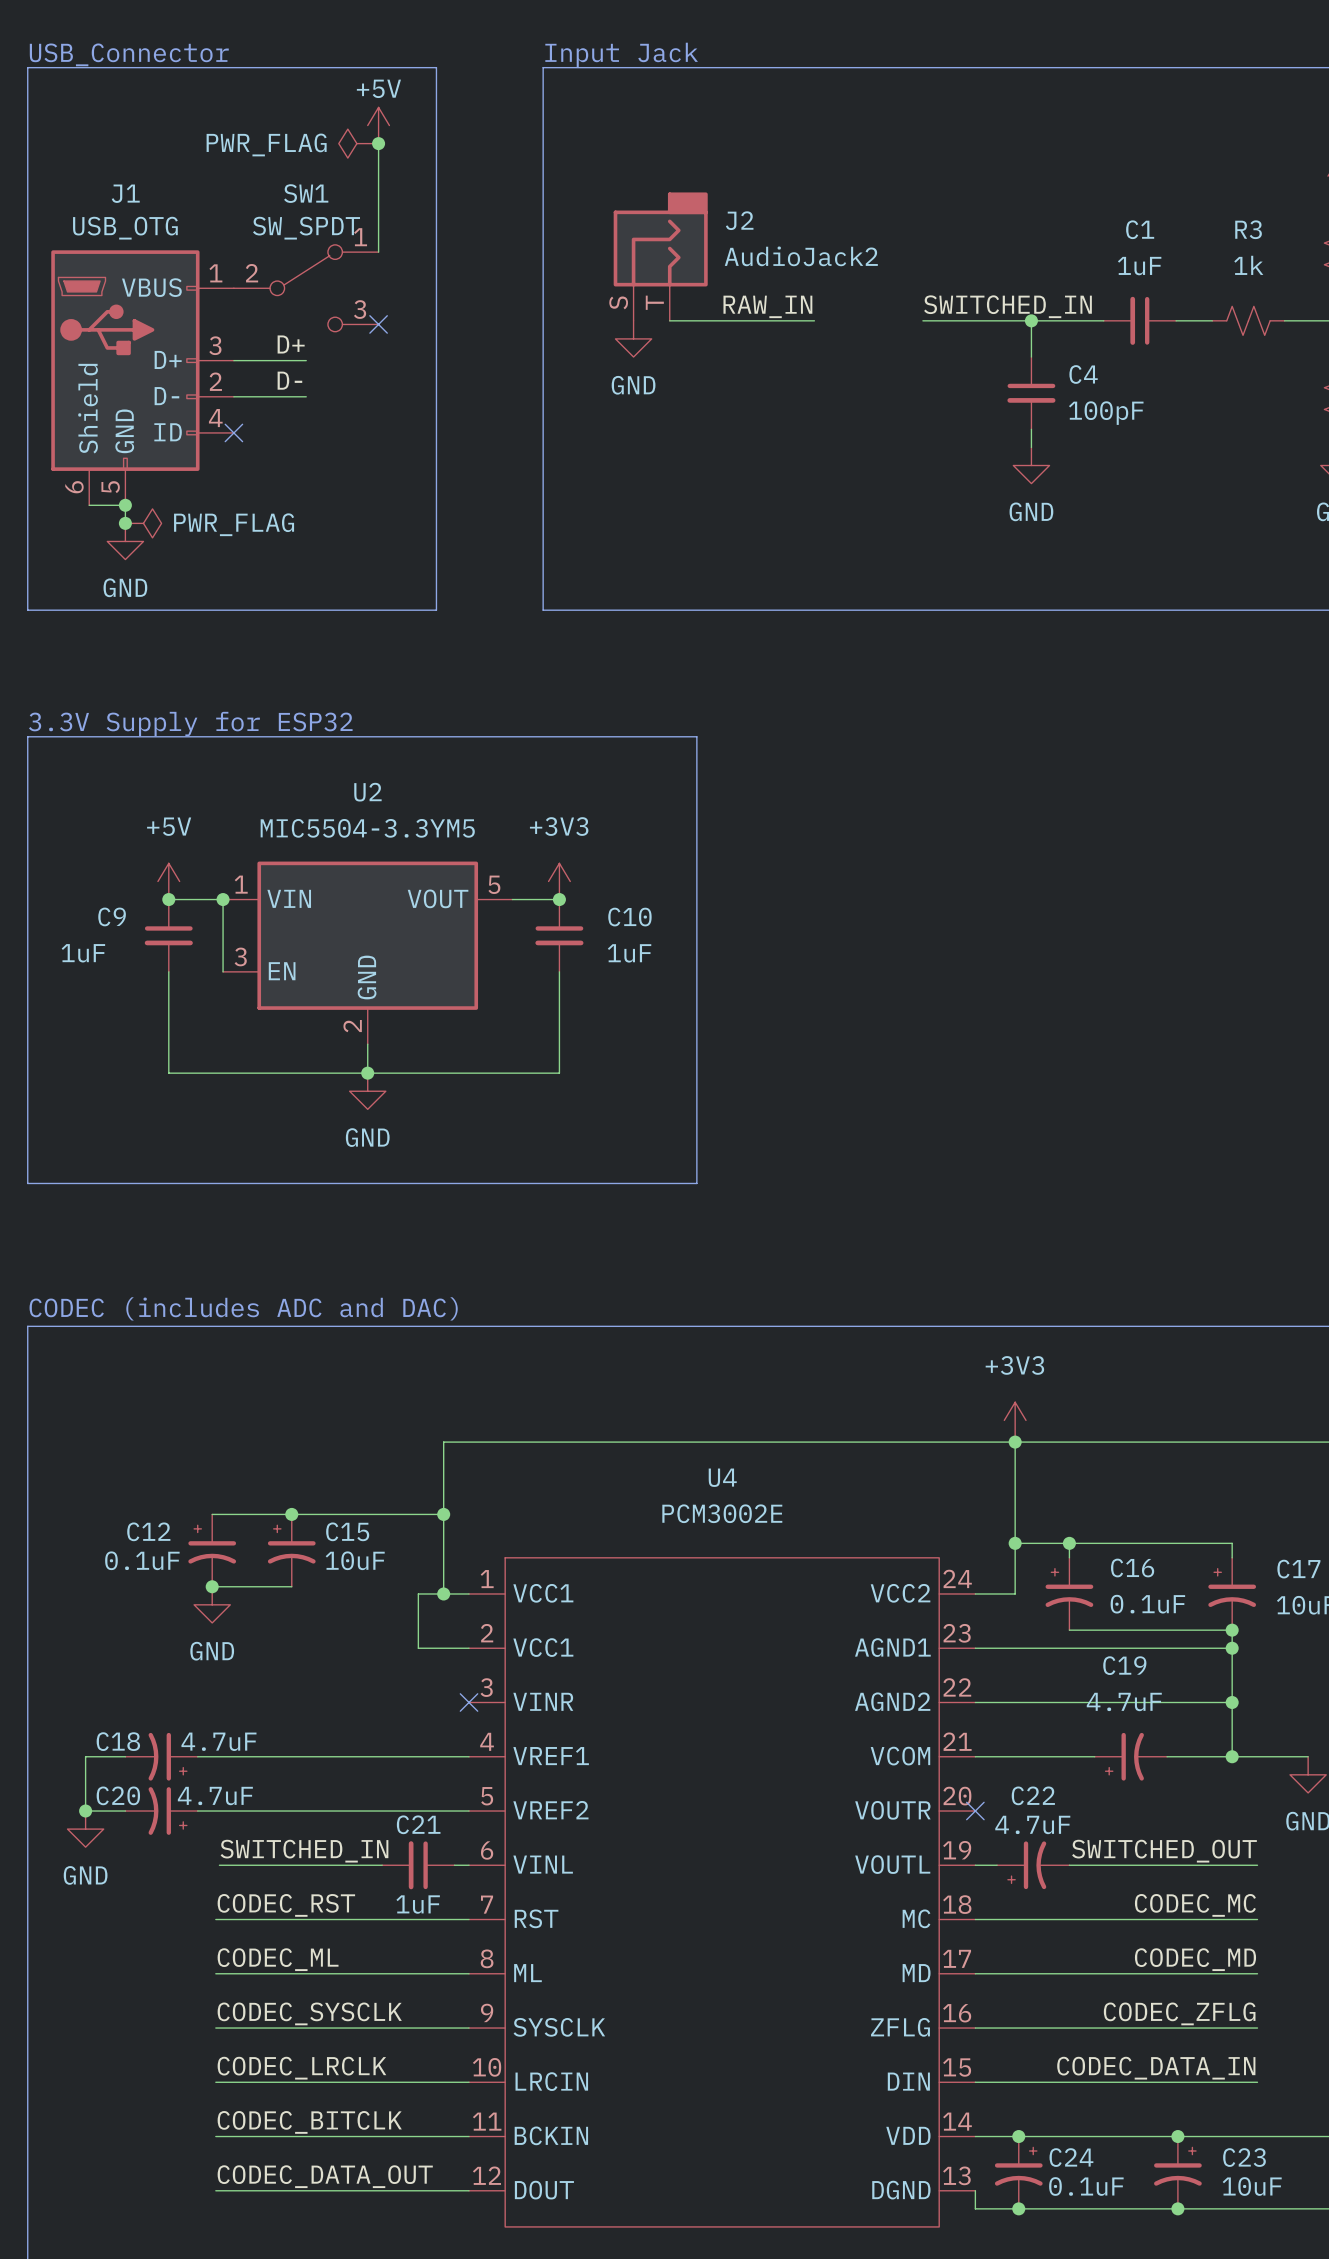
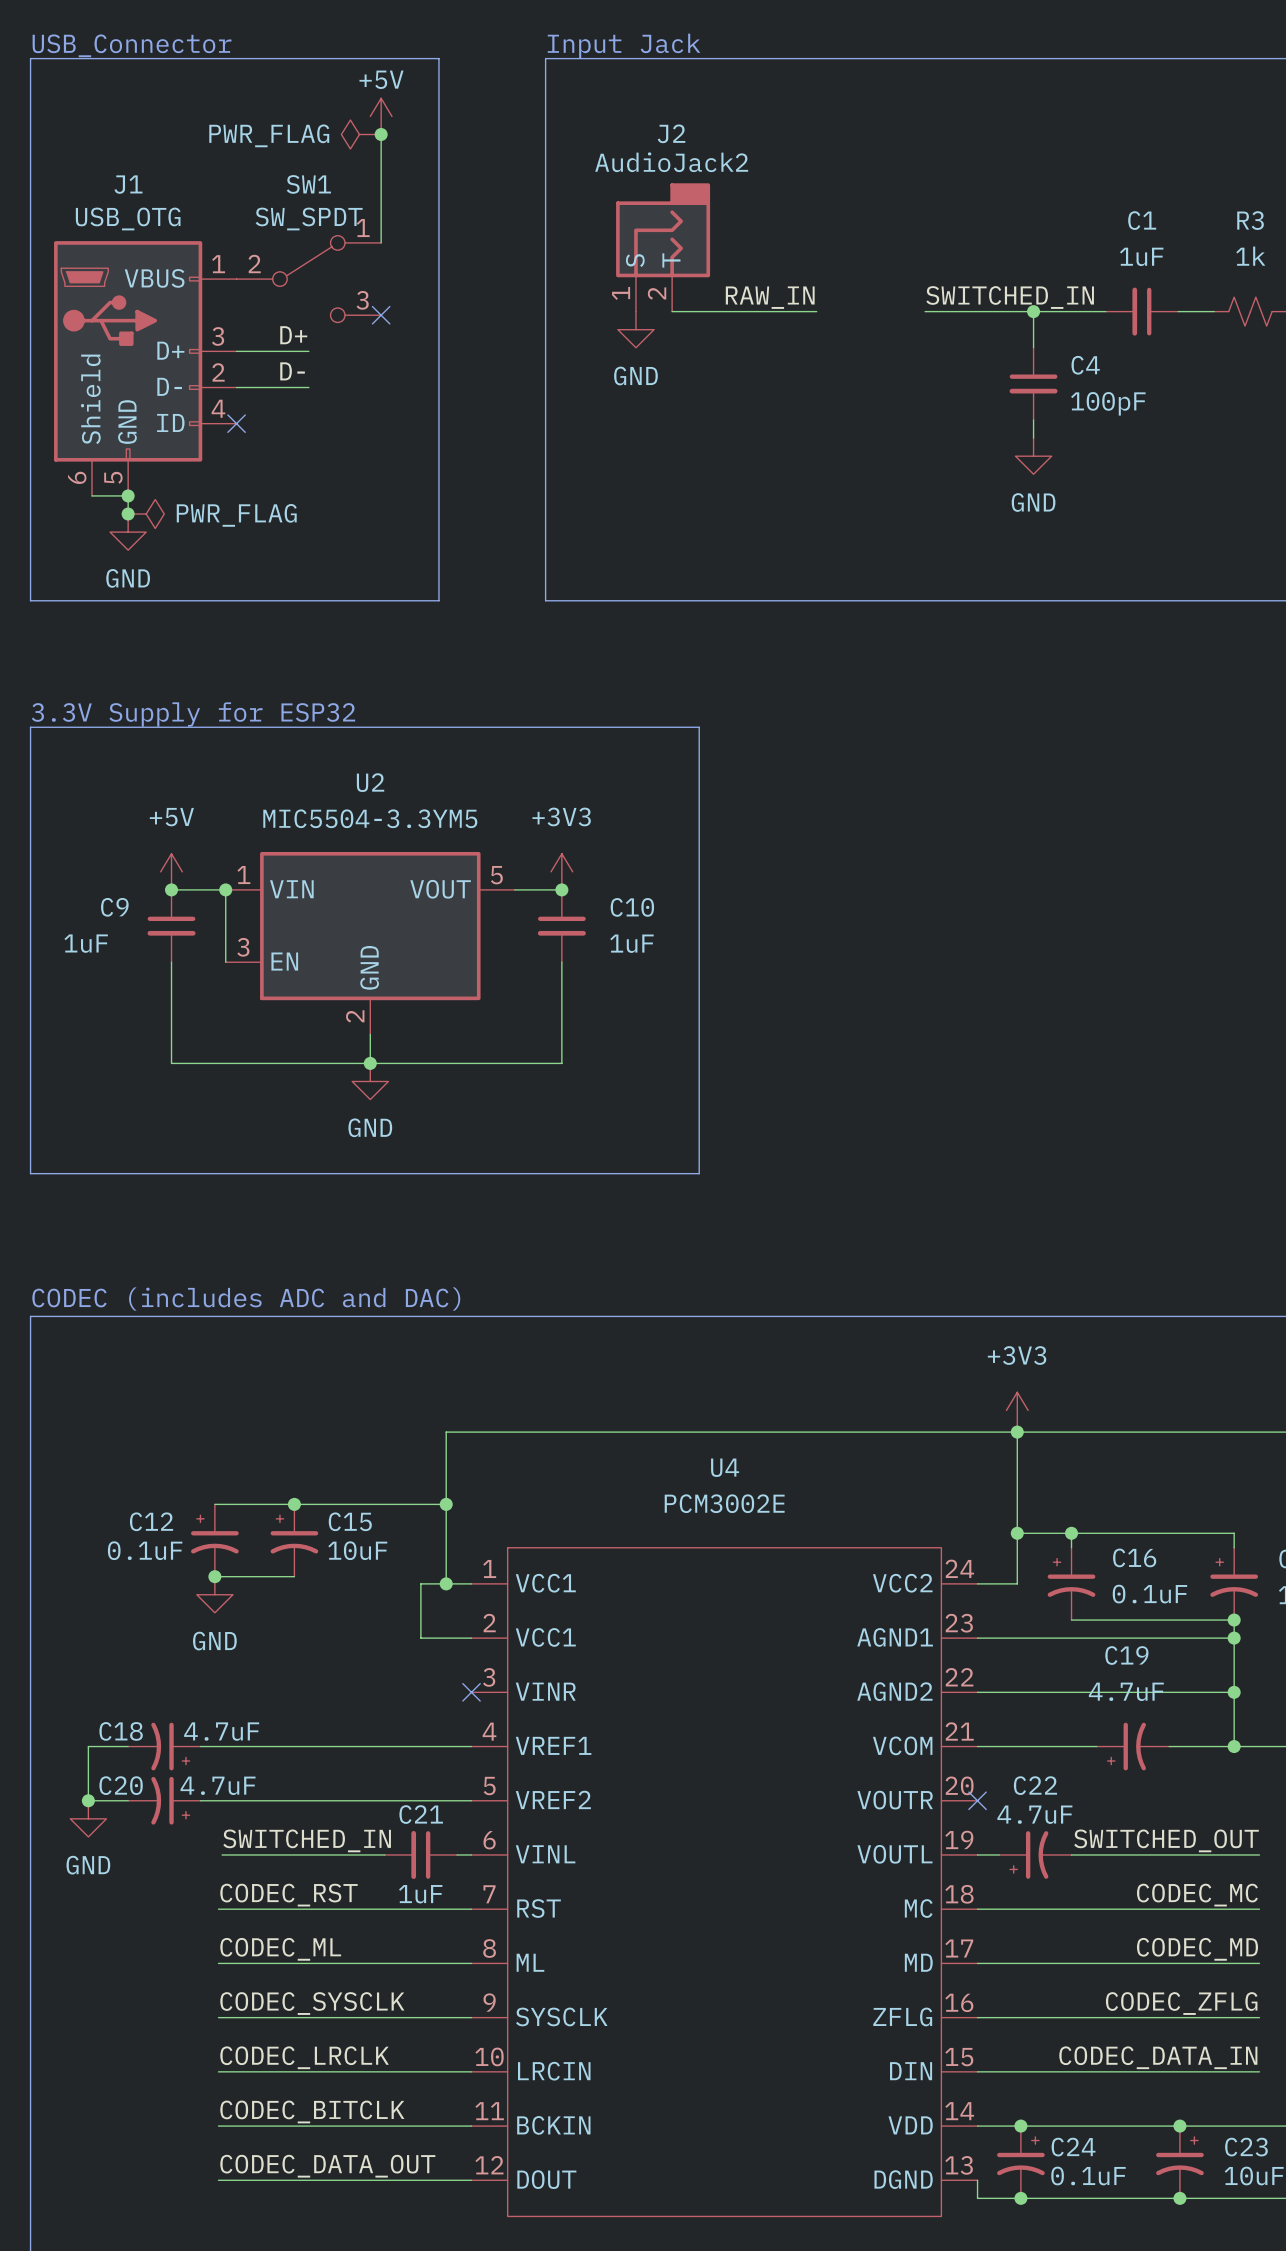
J2 name position: J2 (739, 220) -> J2 (671, 133)
J2 value position: AudioJack2 (801, 256) -> AudioJack2 (671, 162)
J2 pin name: none -> S (635, 260)
J2 pin name: none -> T (671, 260)
J2 pin number: S (618, 302) -> 1 (621, 293)
J2 pin number: T (654, 302) -> 2 (657, 293)

